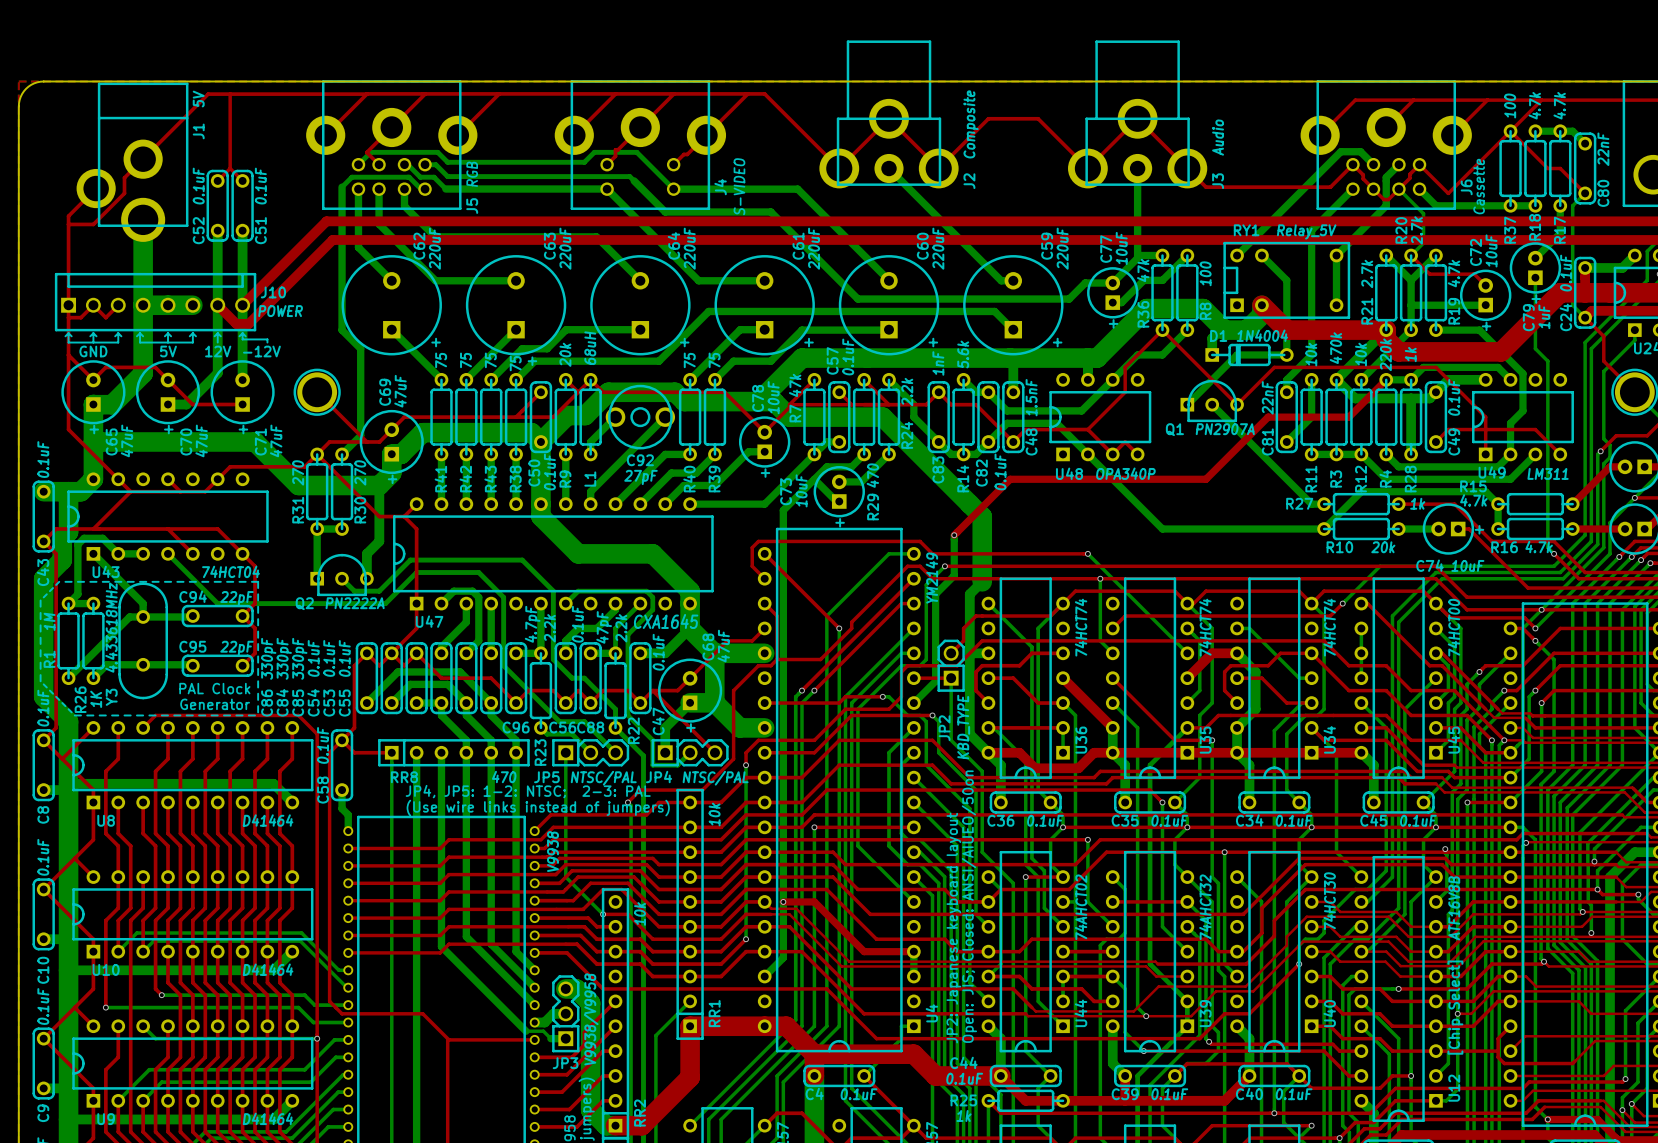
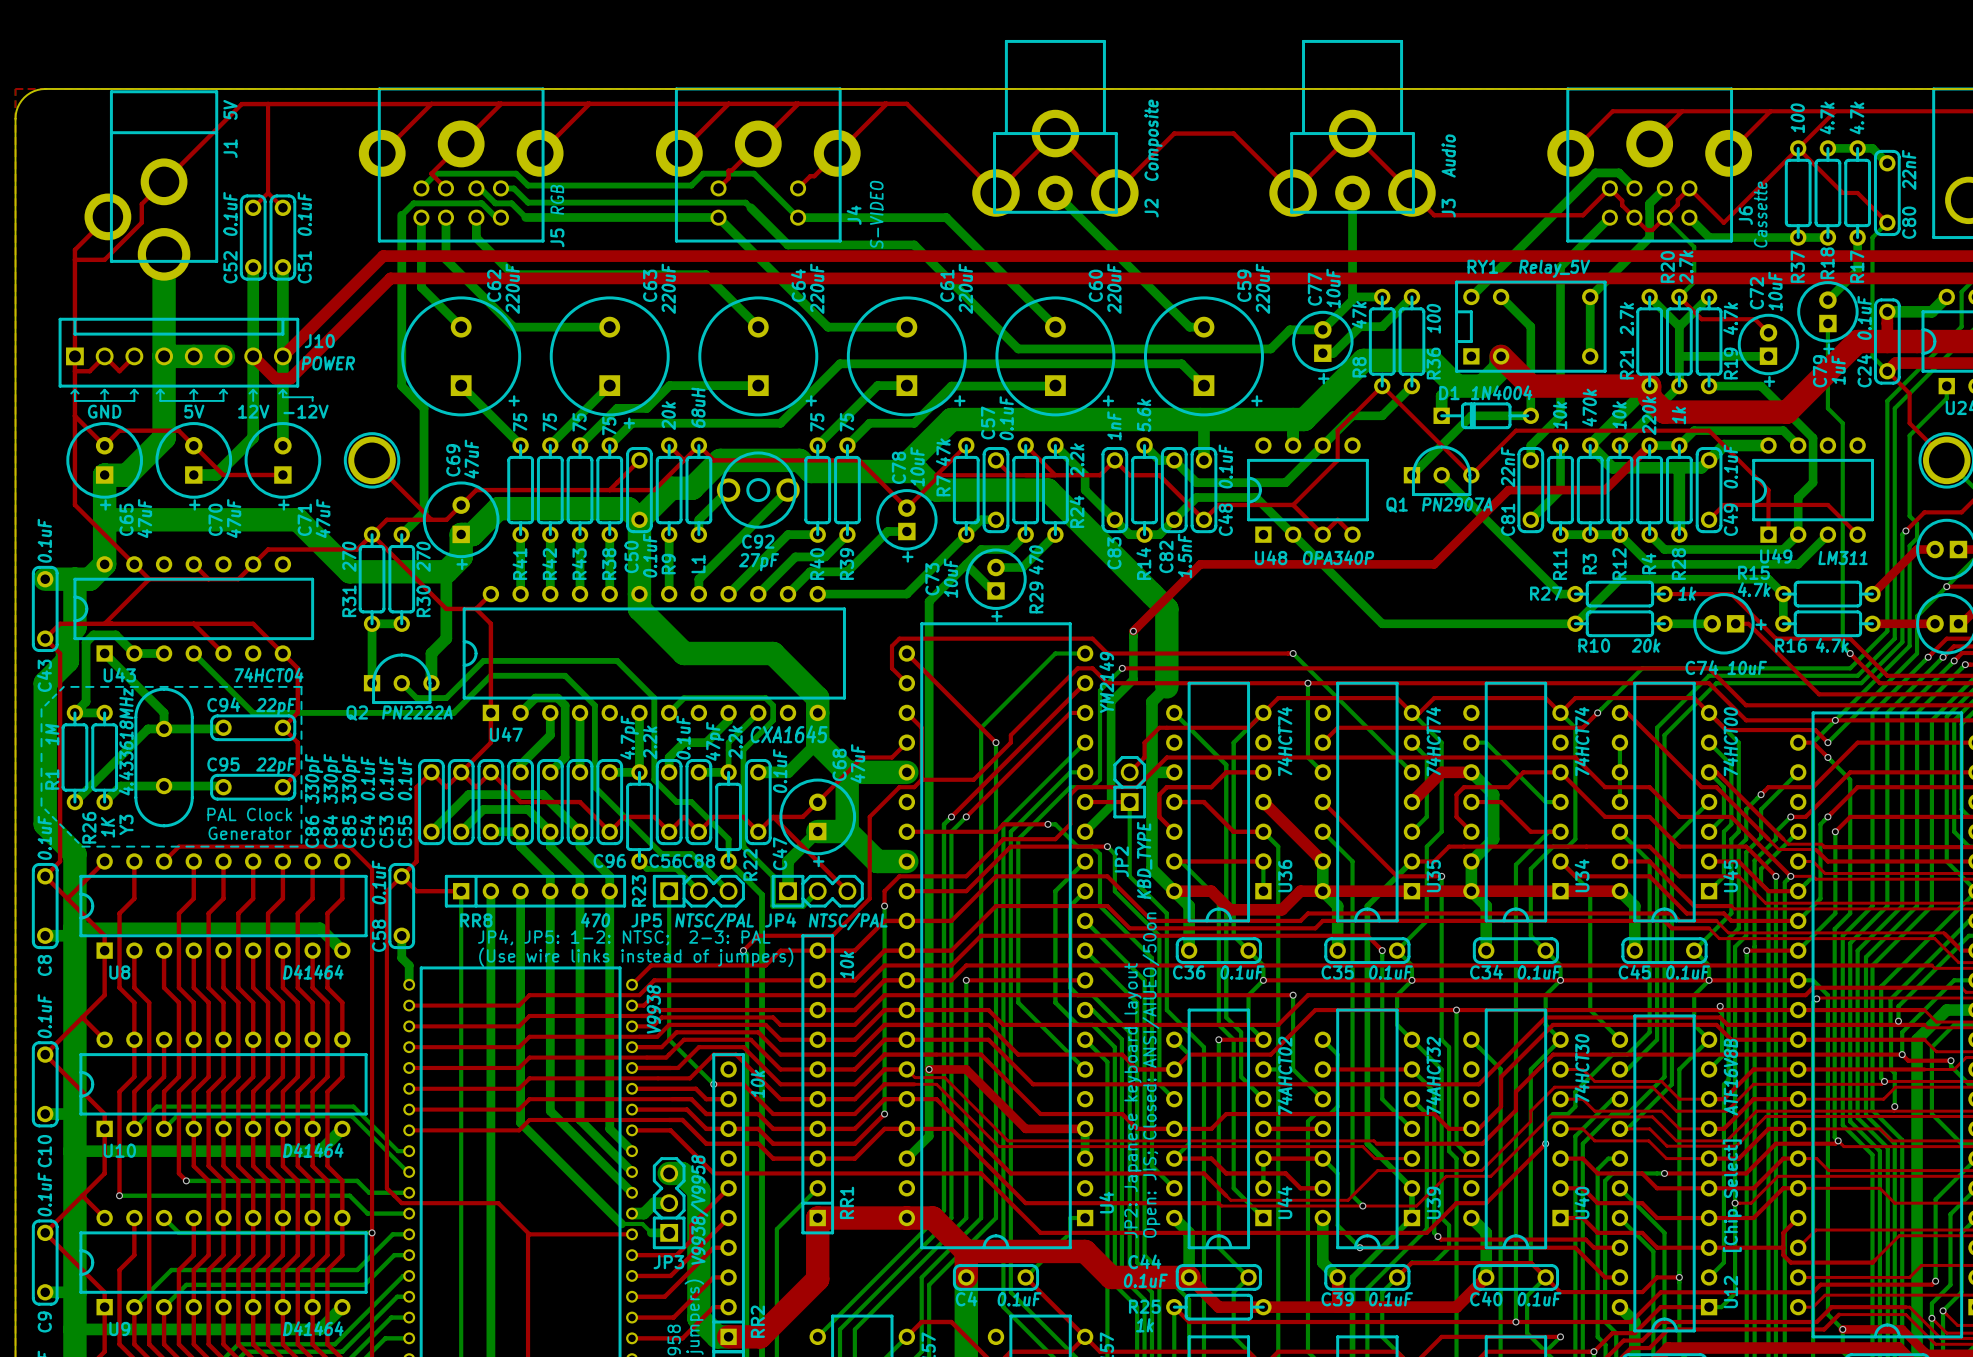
R8 name position: R8 (1205, 311) -> R8 (1359, 367)
R36 name position: R36 (1143, 314) -> R36 (1433, 363)
C82 value position: 1.5nF (1031, 397) -> 1.5nF (1184, 555)
C48 value position: 0.1uF (1000, 471) -> 0.1uF (1225, 466)

